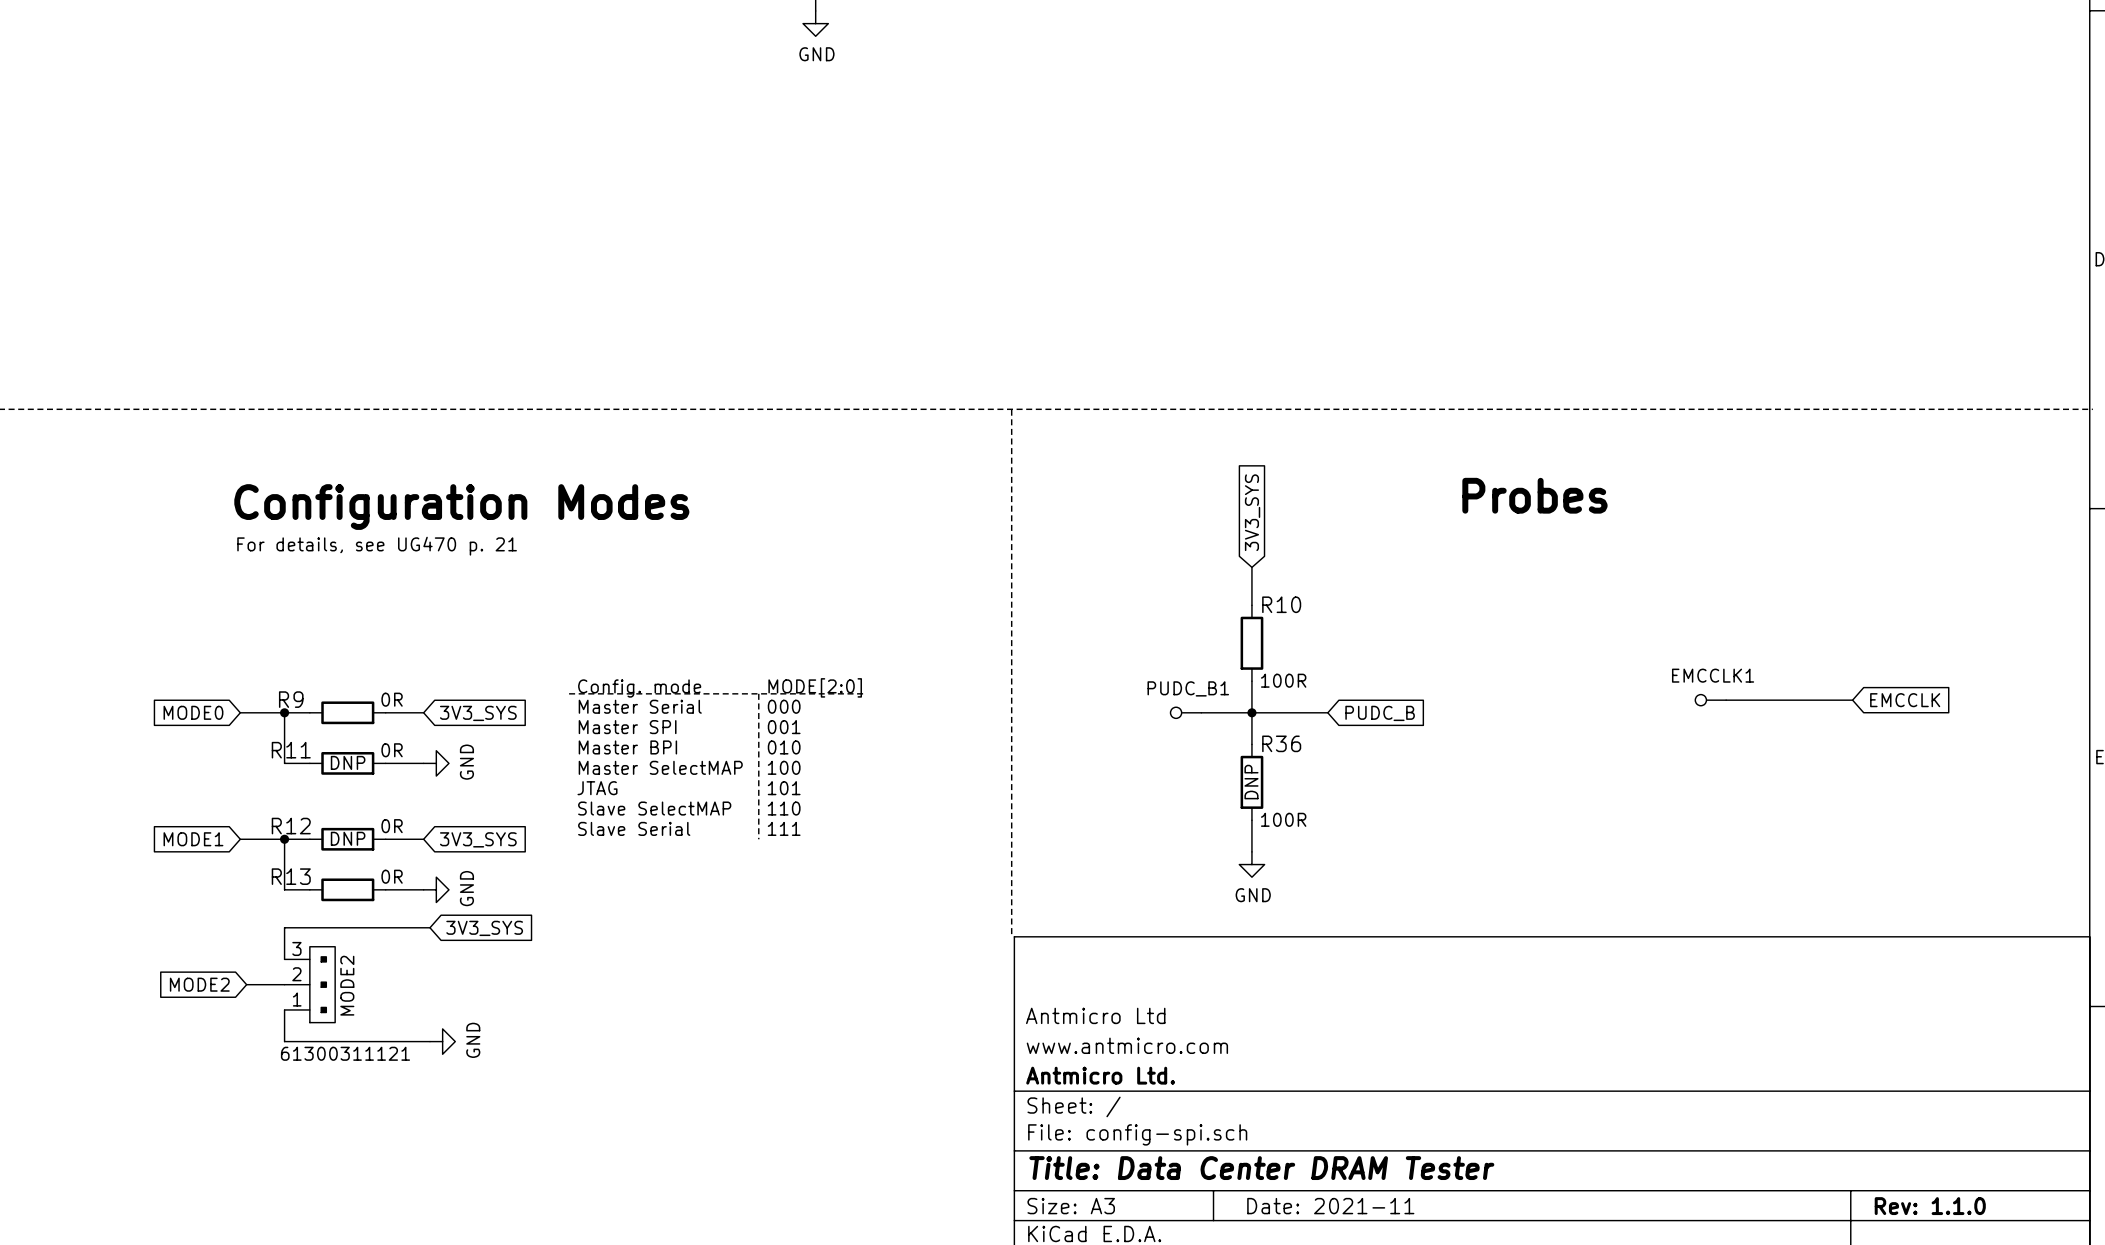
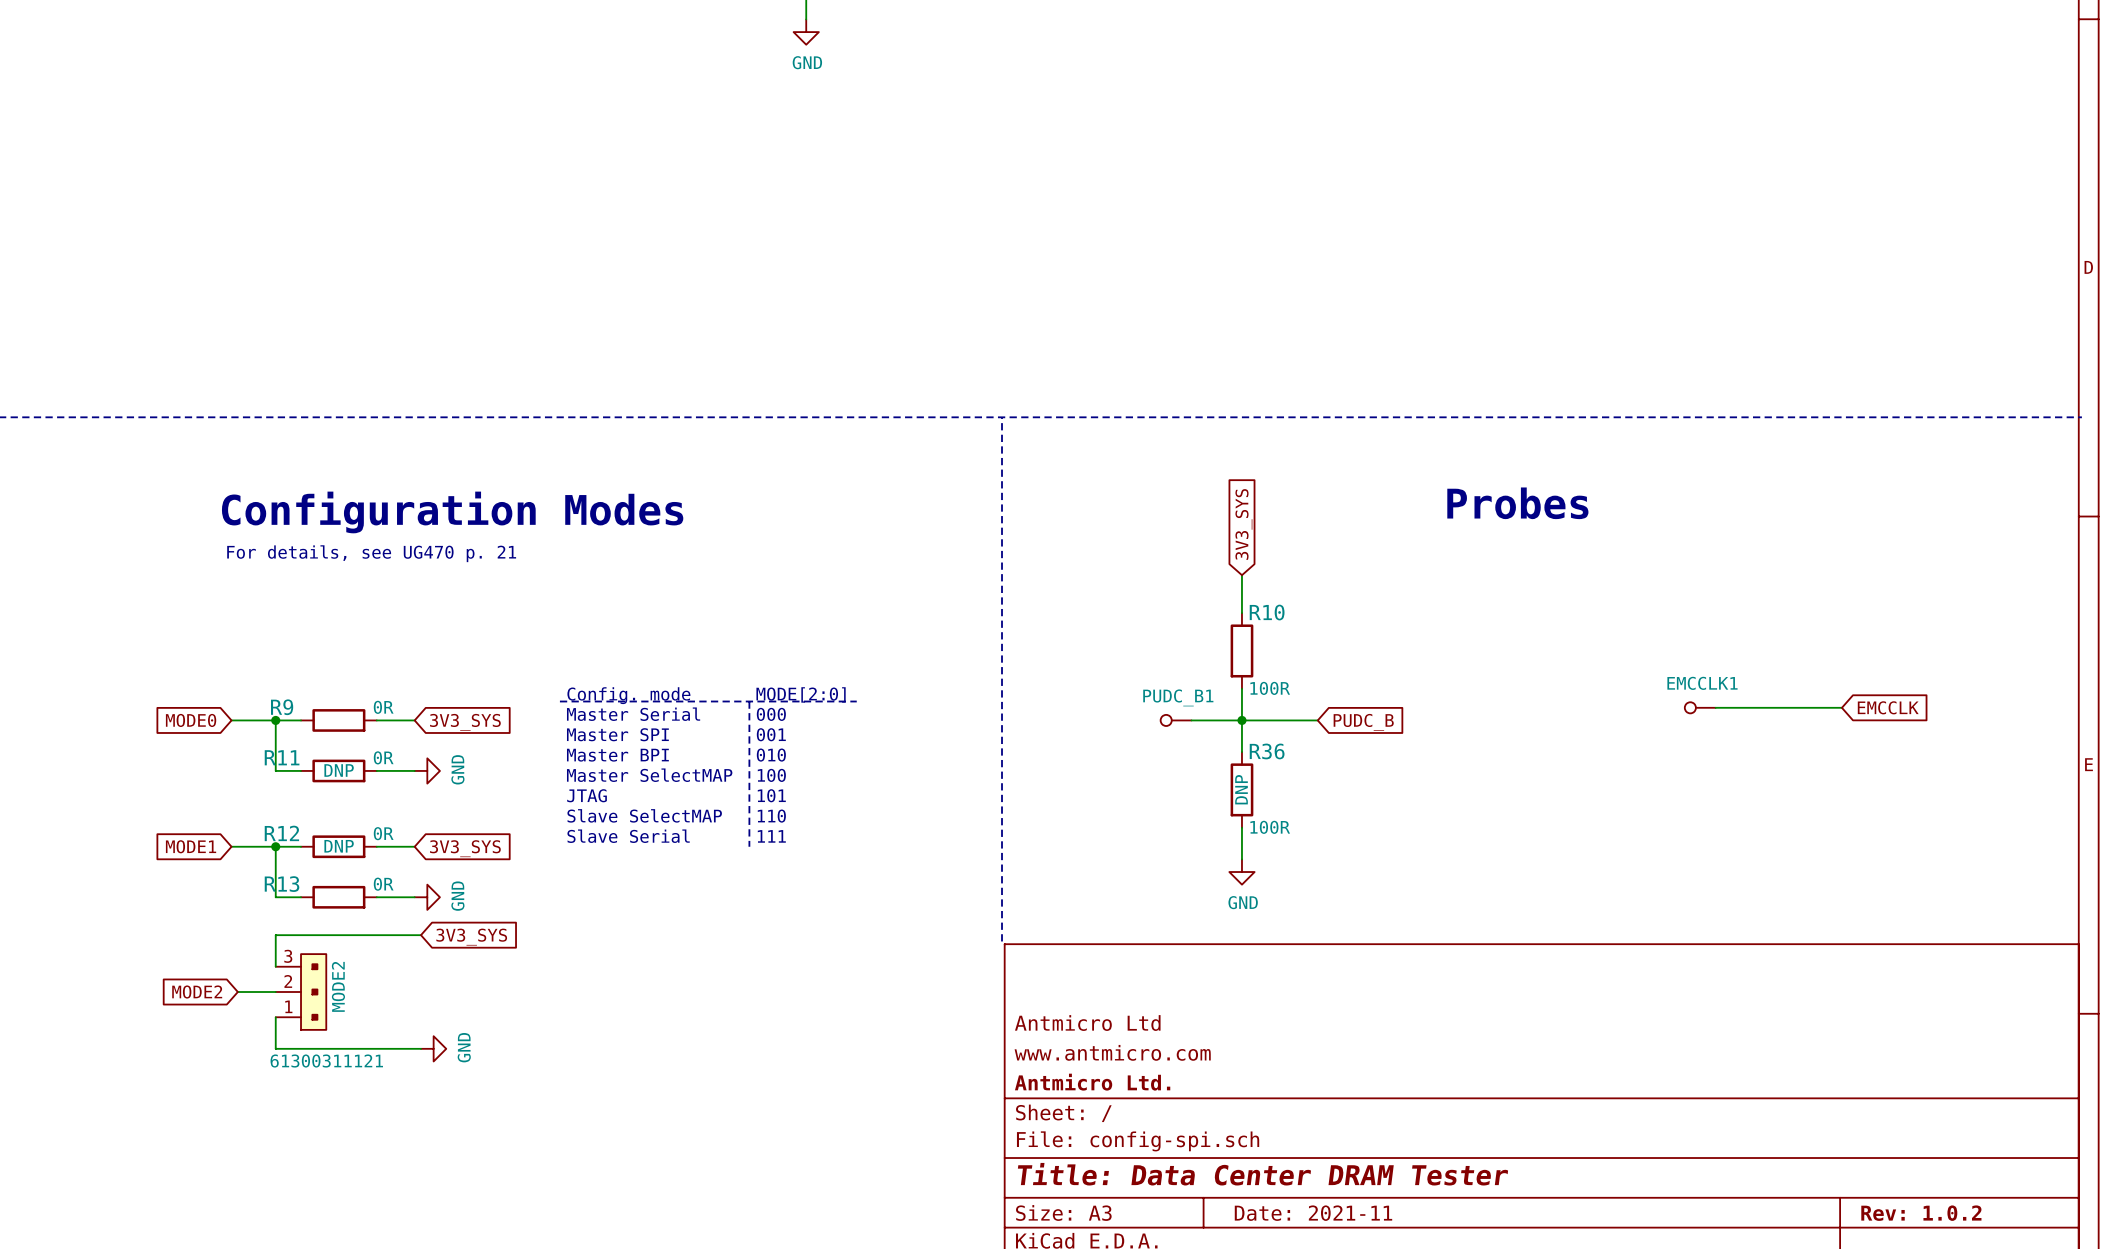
title block: Rev: 1.1.0 (1930, 1206) -> Rev: 1.0.2 (1921, 1213)

